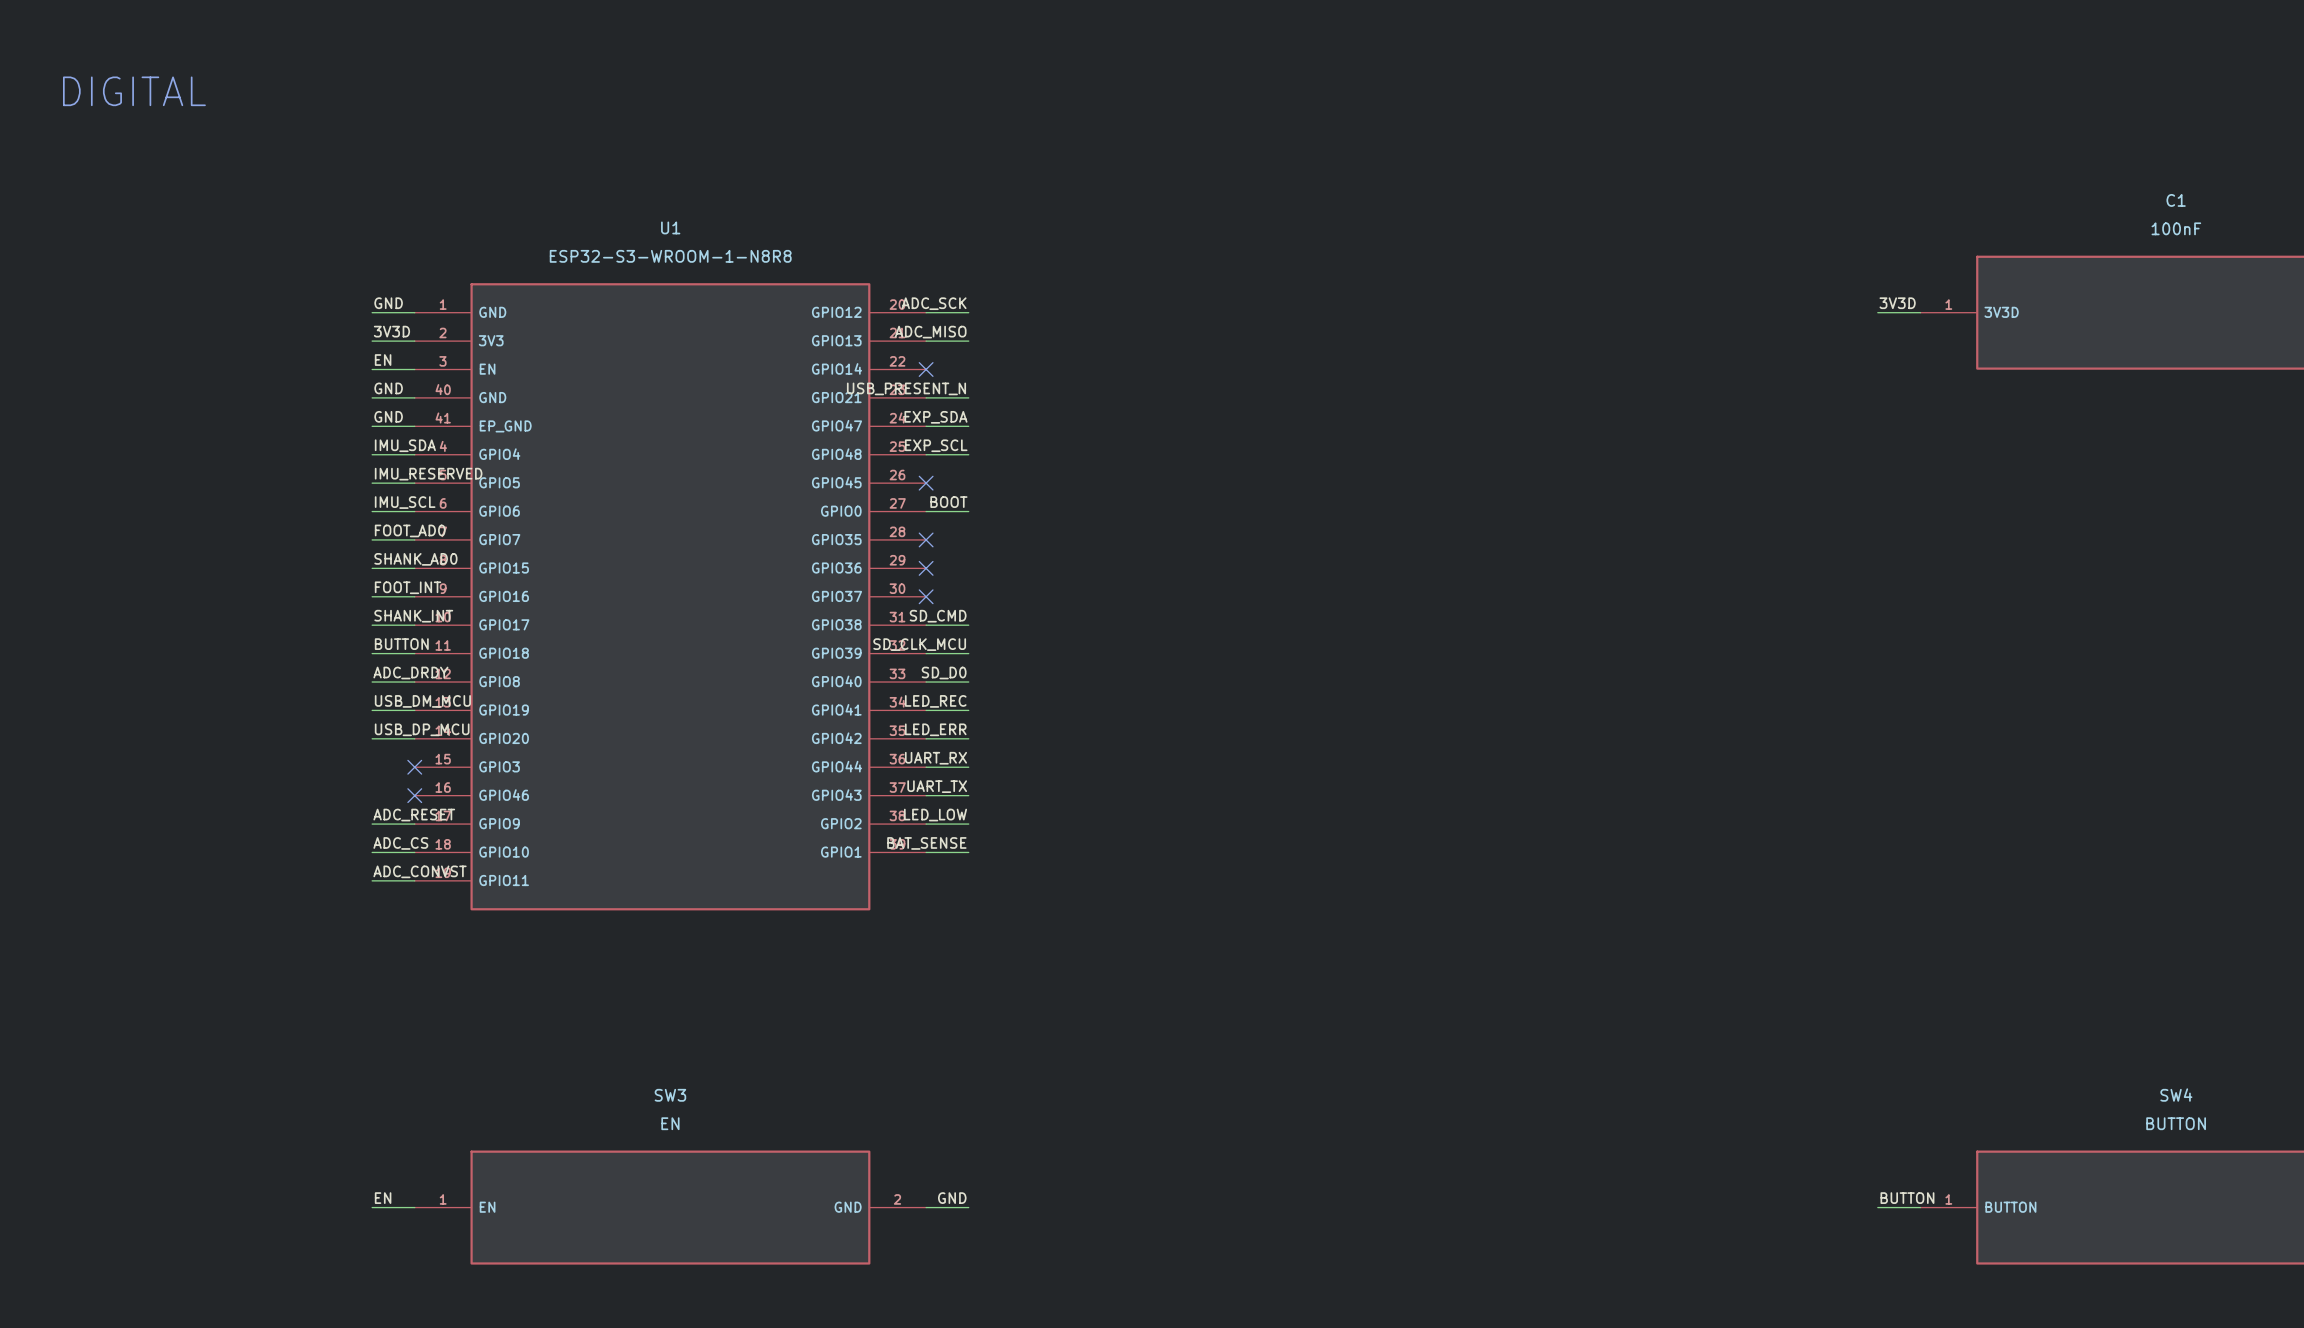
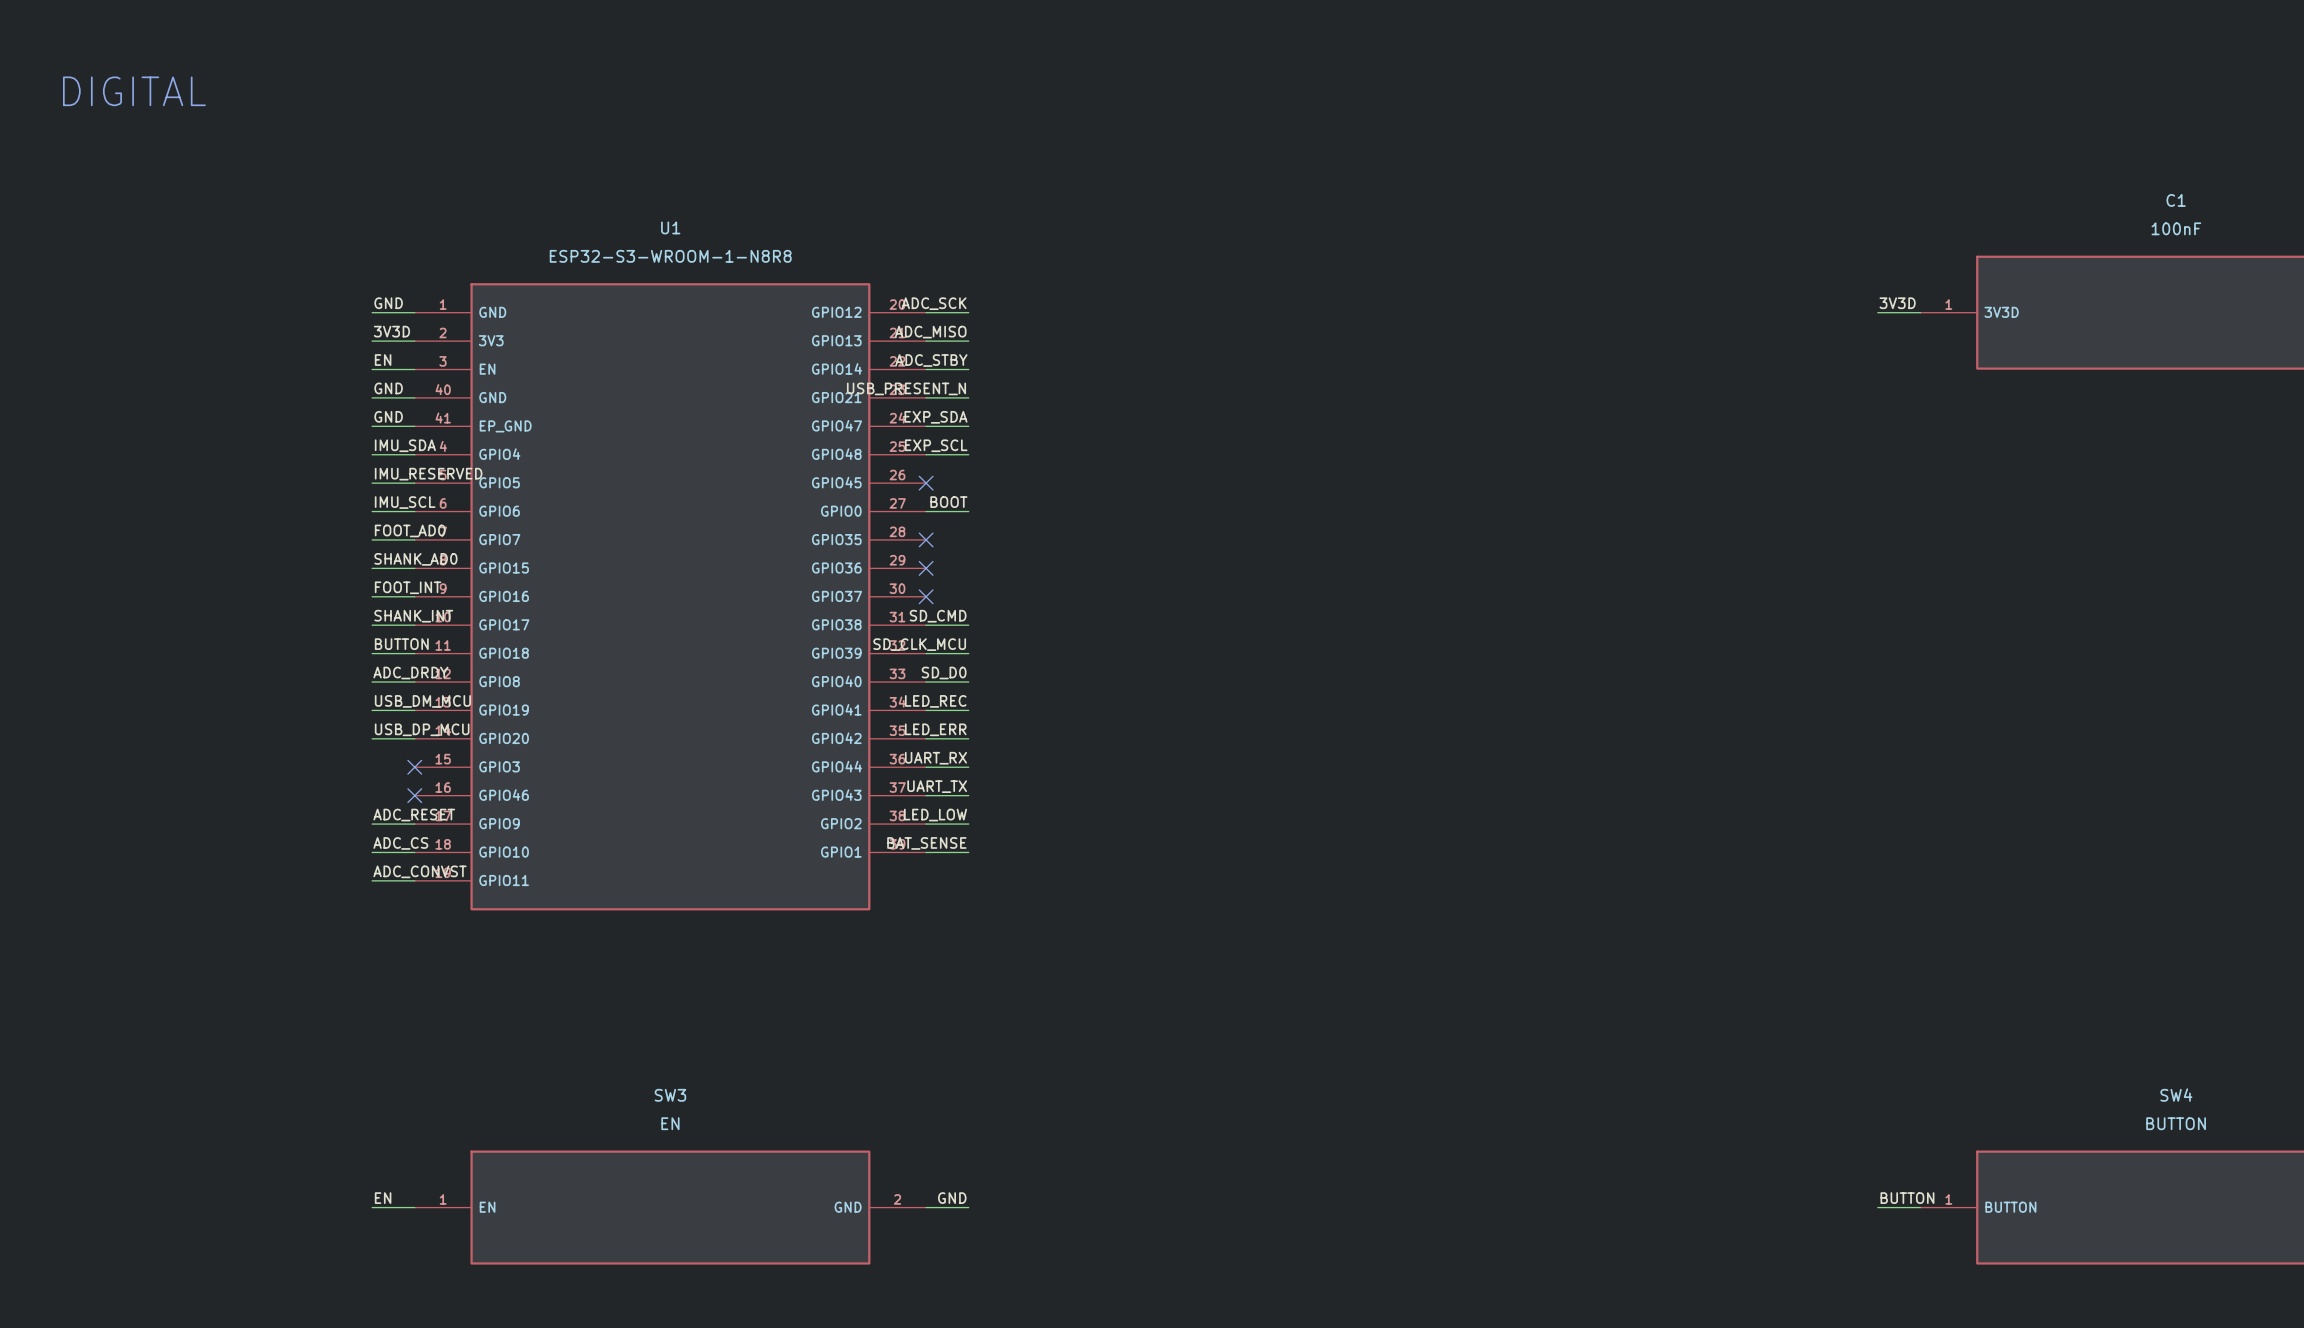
label: none -> ADC_STBY (931, 360)
wire: none -> (926, 369) (968, 369)
no-connect mark: (926, 369) -> none

